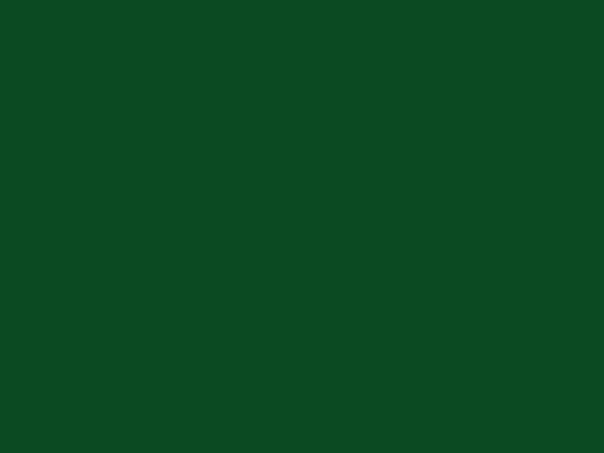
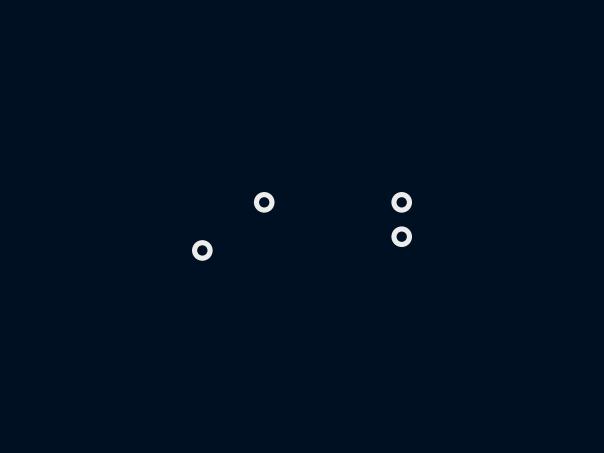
via: none -> (264, 202)
via: none -> (401, 202)
via: none -> (401, 236)
via: none -> (202, 250)

